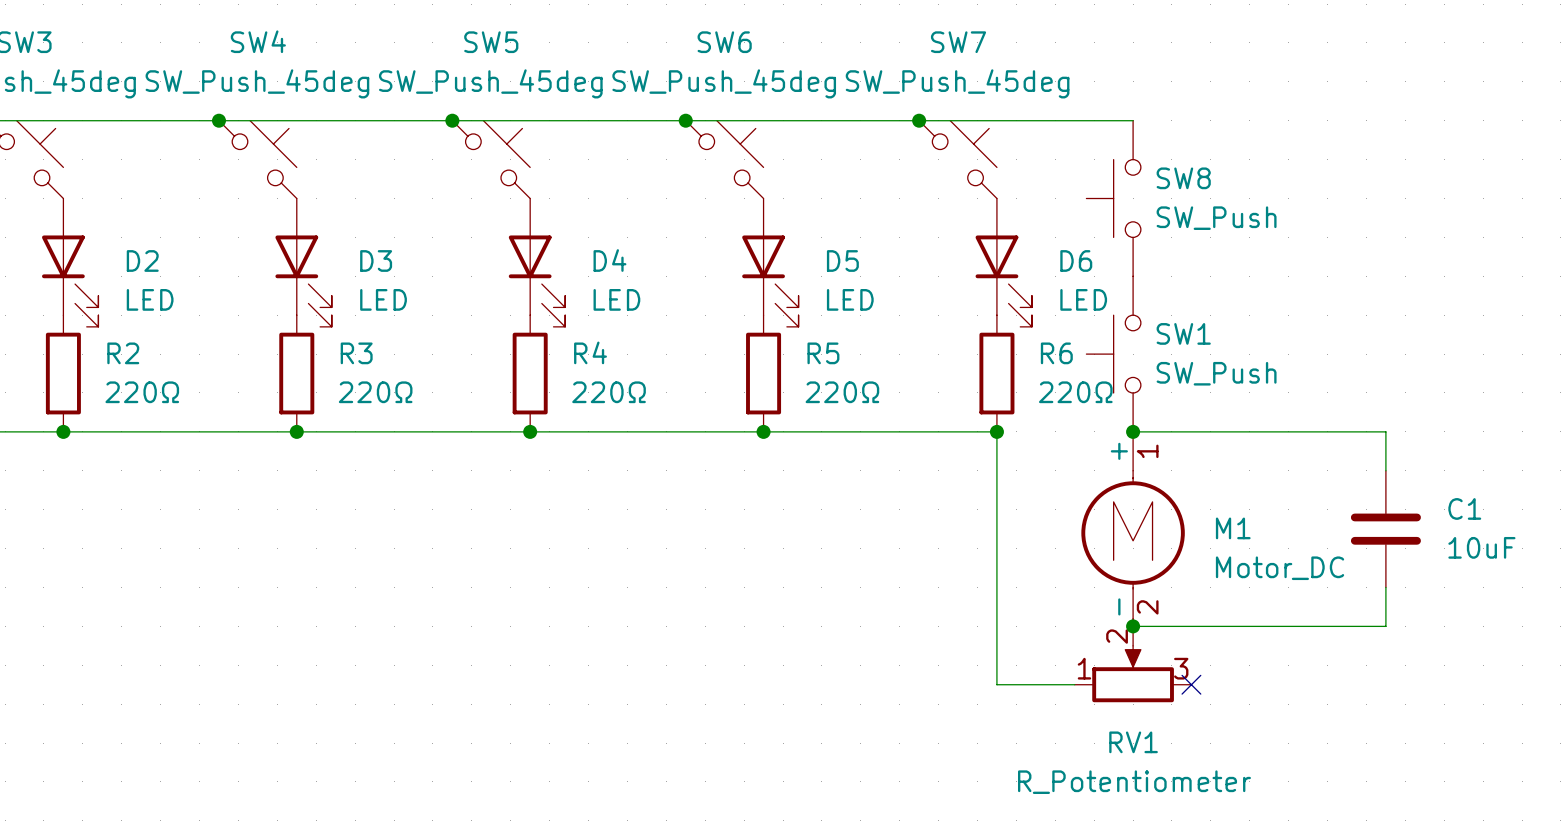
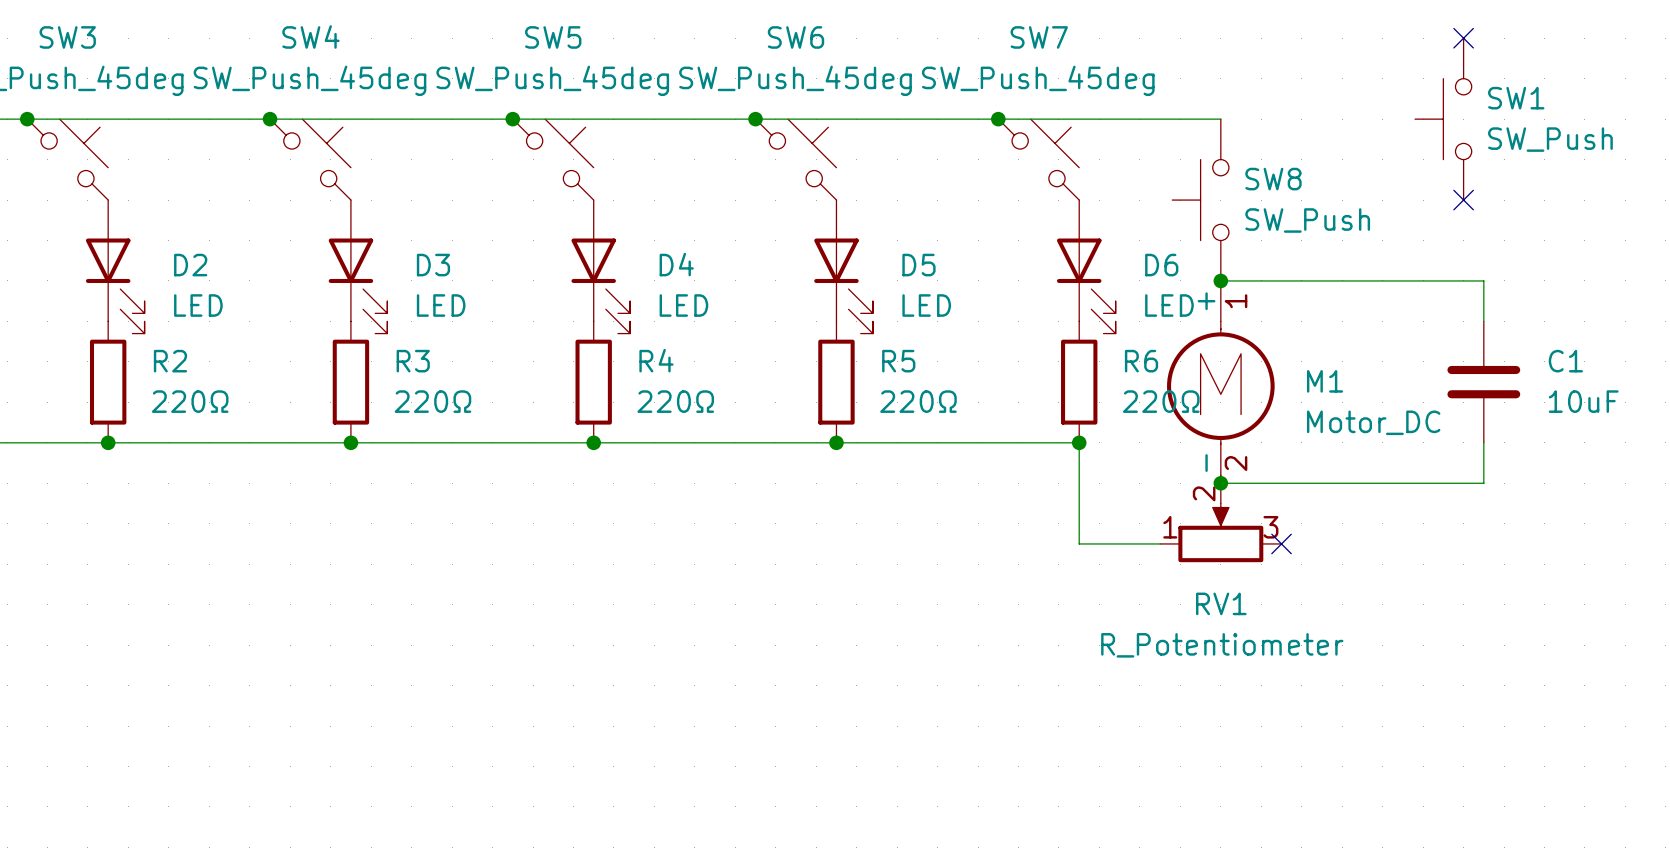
no-connect mark: none -> (1463, 38)
no-connect mark: none -> (1463, 200)
wire: none -> (1220, 280) (1483, 280) (1483, 321)
junction: none -> (1220, 280)
SW1 position: (1113, 354) -> (1443, 119)
wire: (1133, 431) (1385, 431) -> (1220, 483) (1483, 483)
junction position: (1133, 431) -> (1220, 483)
wire: (996, 529) (996, 684) (1074, 684) -> (1079, 543) (1160, 543)
M1 position: (1133, 529) -> (1220, 382)
no-connect mark: none -> (1281, 543)
C1 position: (1385, 529) -> (1483, 382)
wire: (1385, 587) (1385, 626) (1133, 626) -> none
junction: (1133, 626) -> none
RV1 position: (1133, 664) -> (1220, 522)
no-connect mark: (1191, 684) -> none

